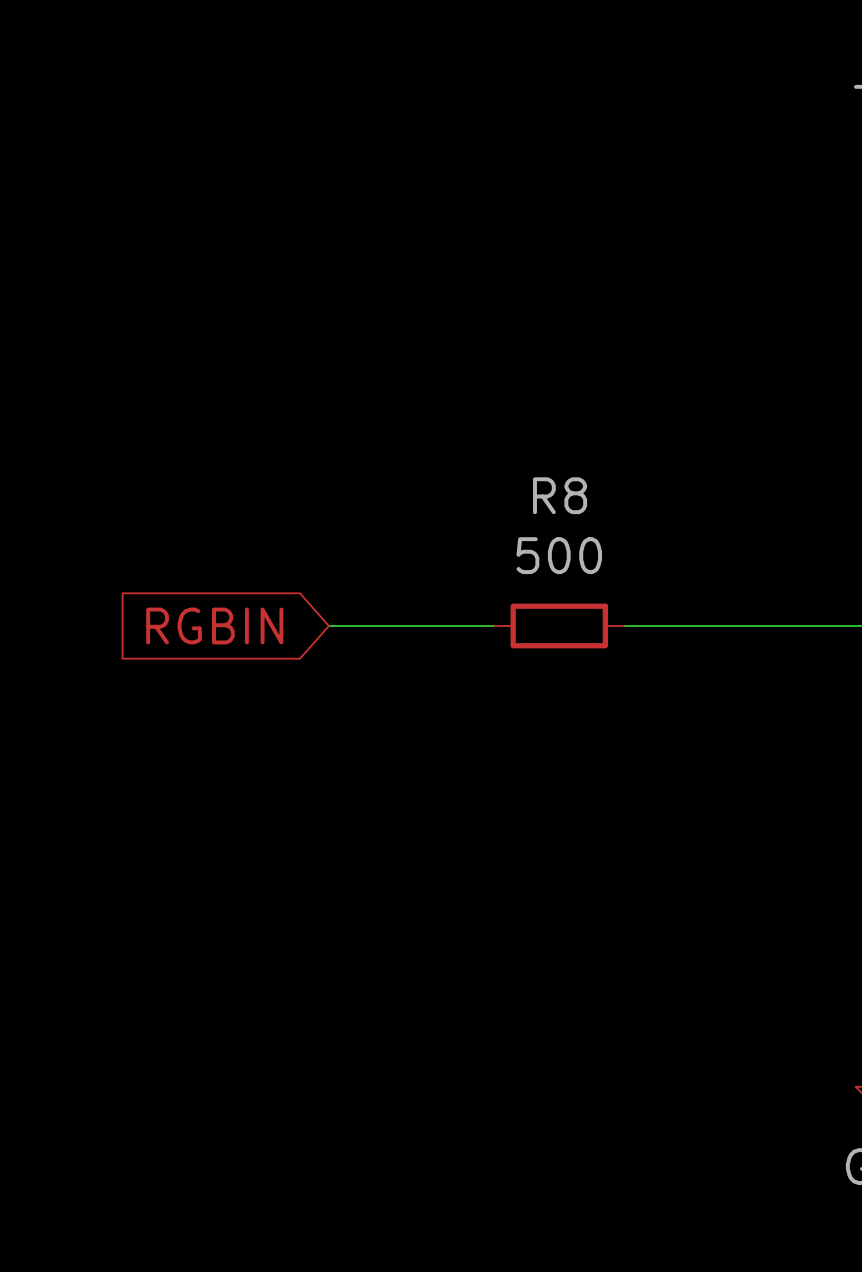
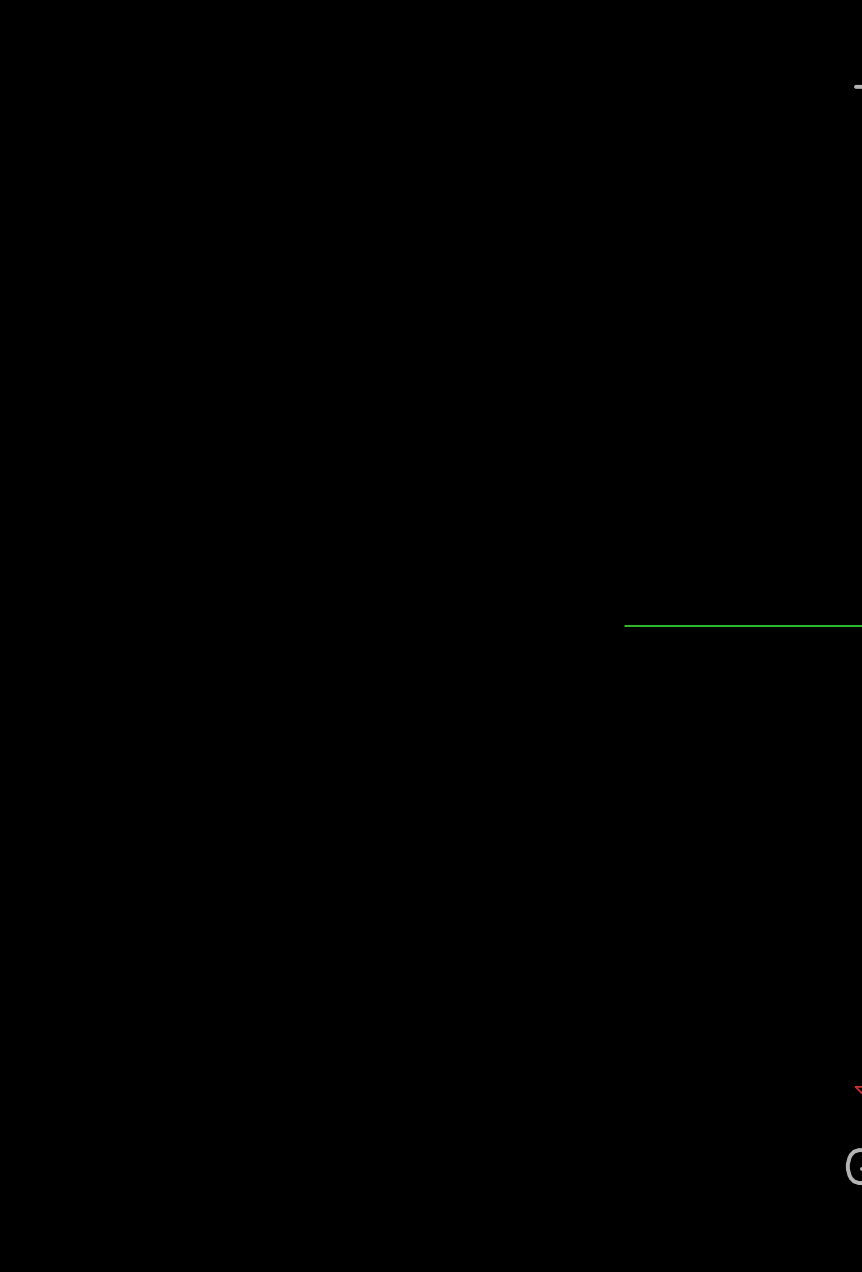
global label: RGBIN (214, 625) -> none
wire: (328, 625) (493, 625) -> none
R8: 500 (559, 625) -> none

